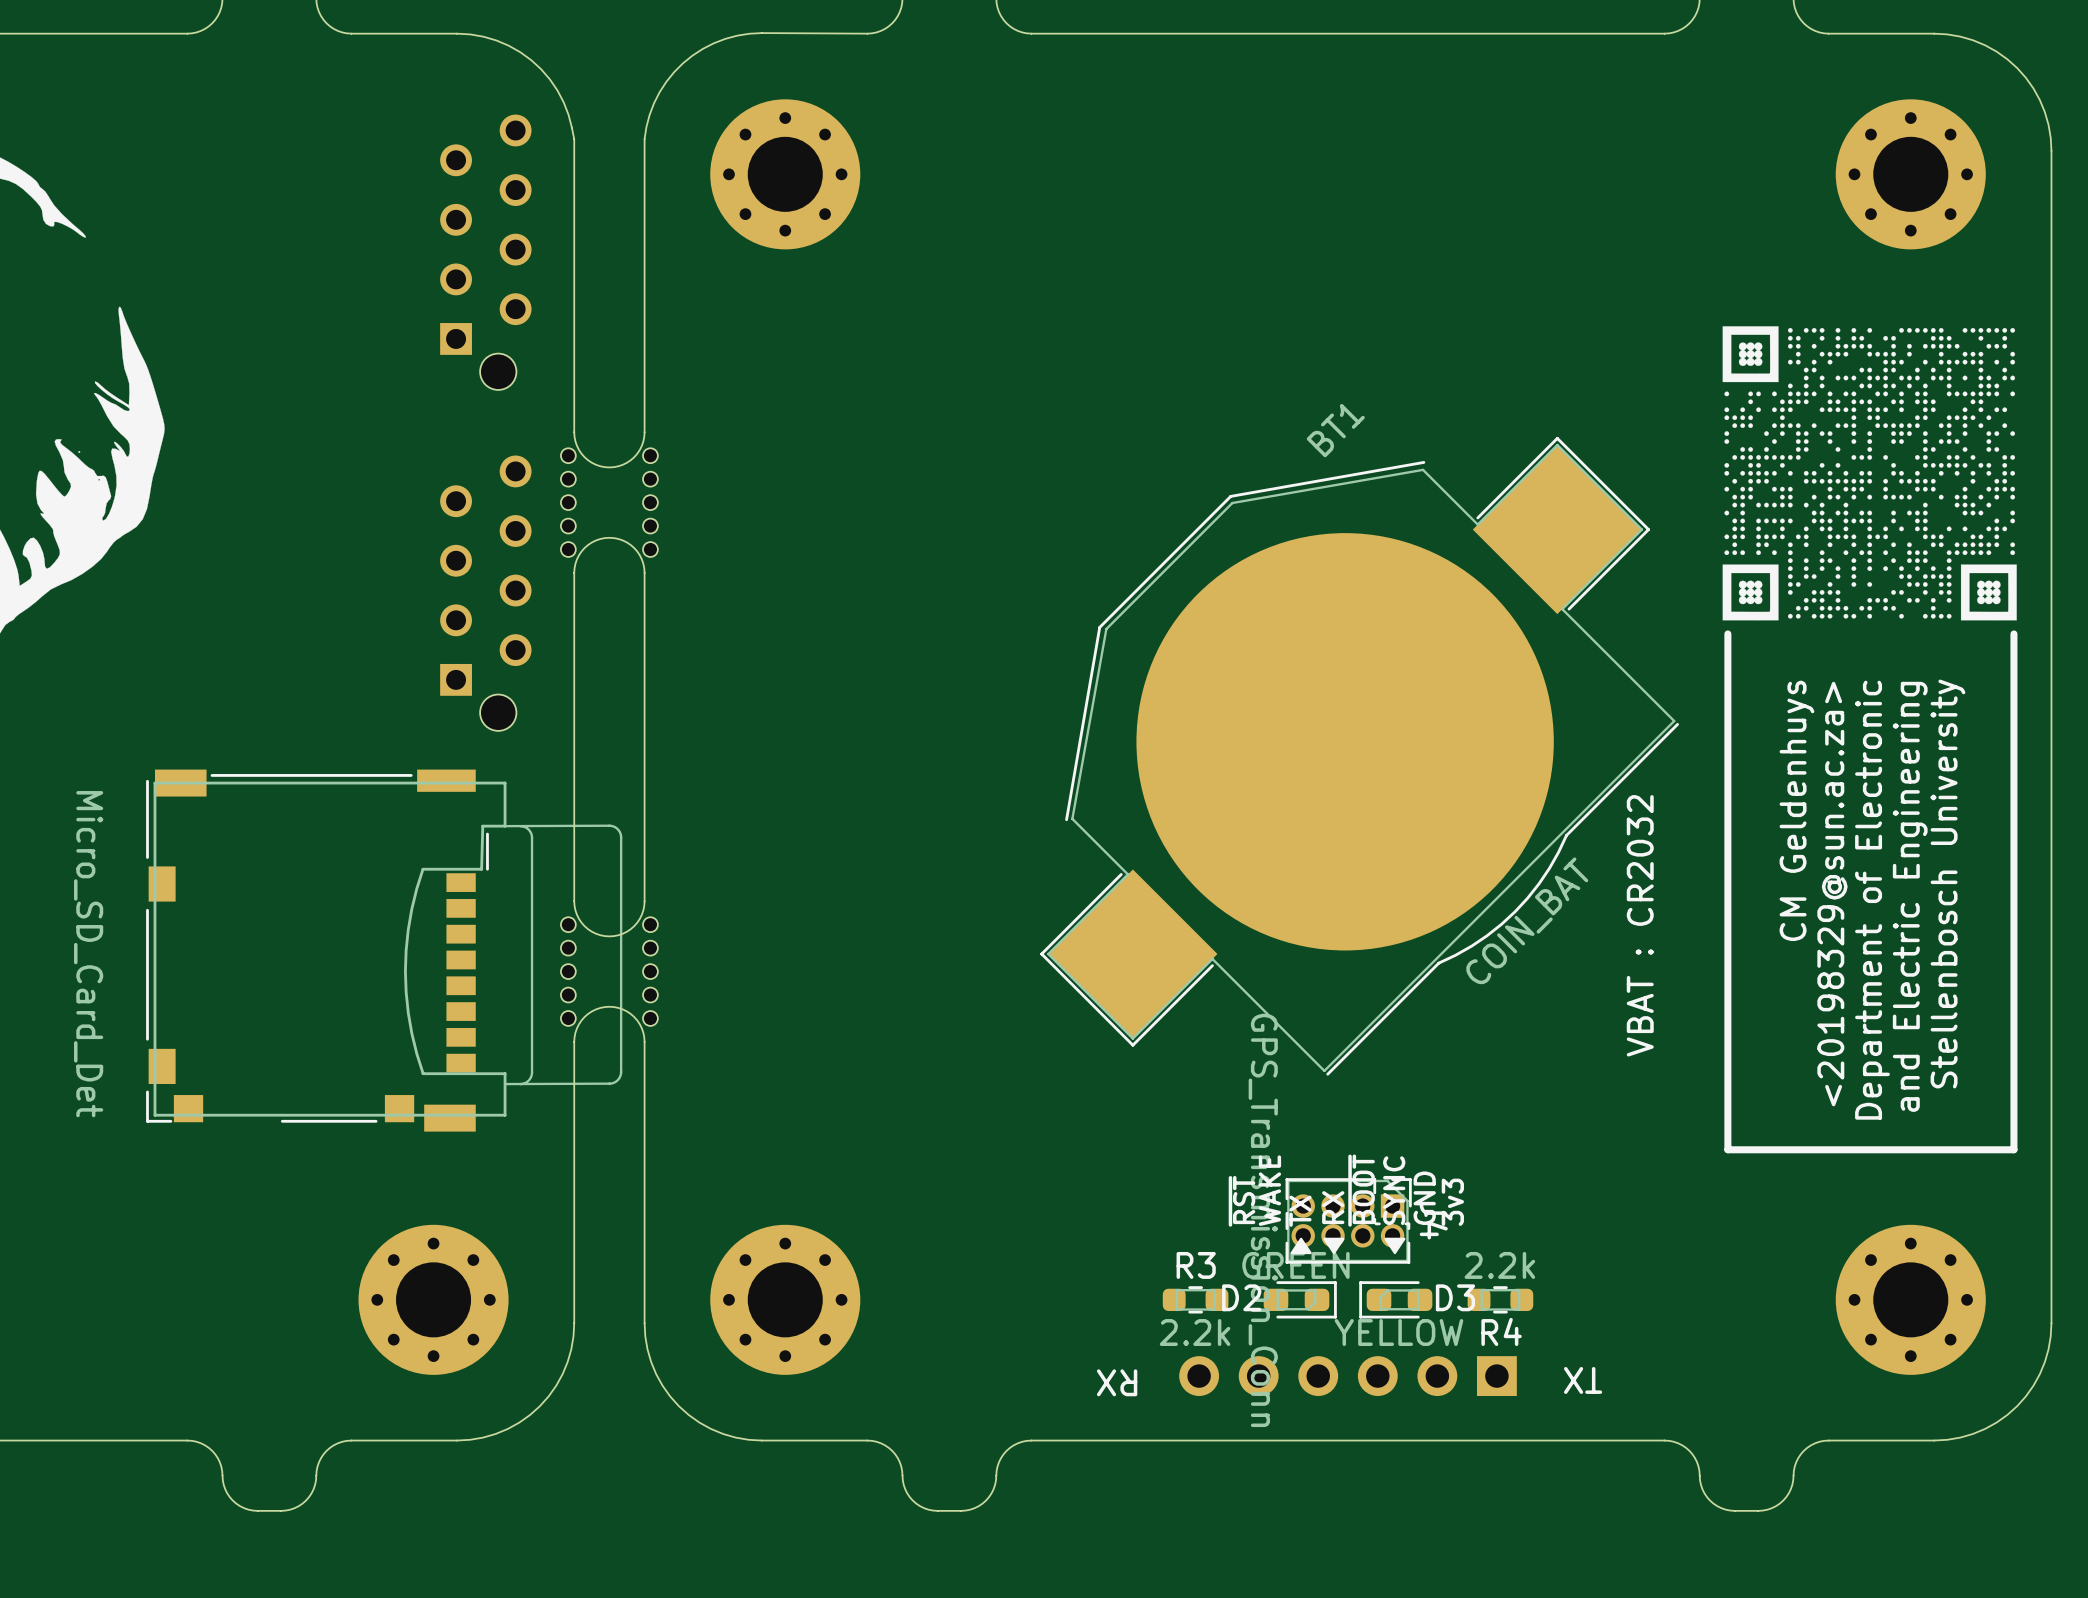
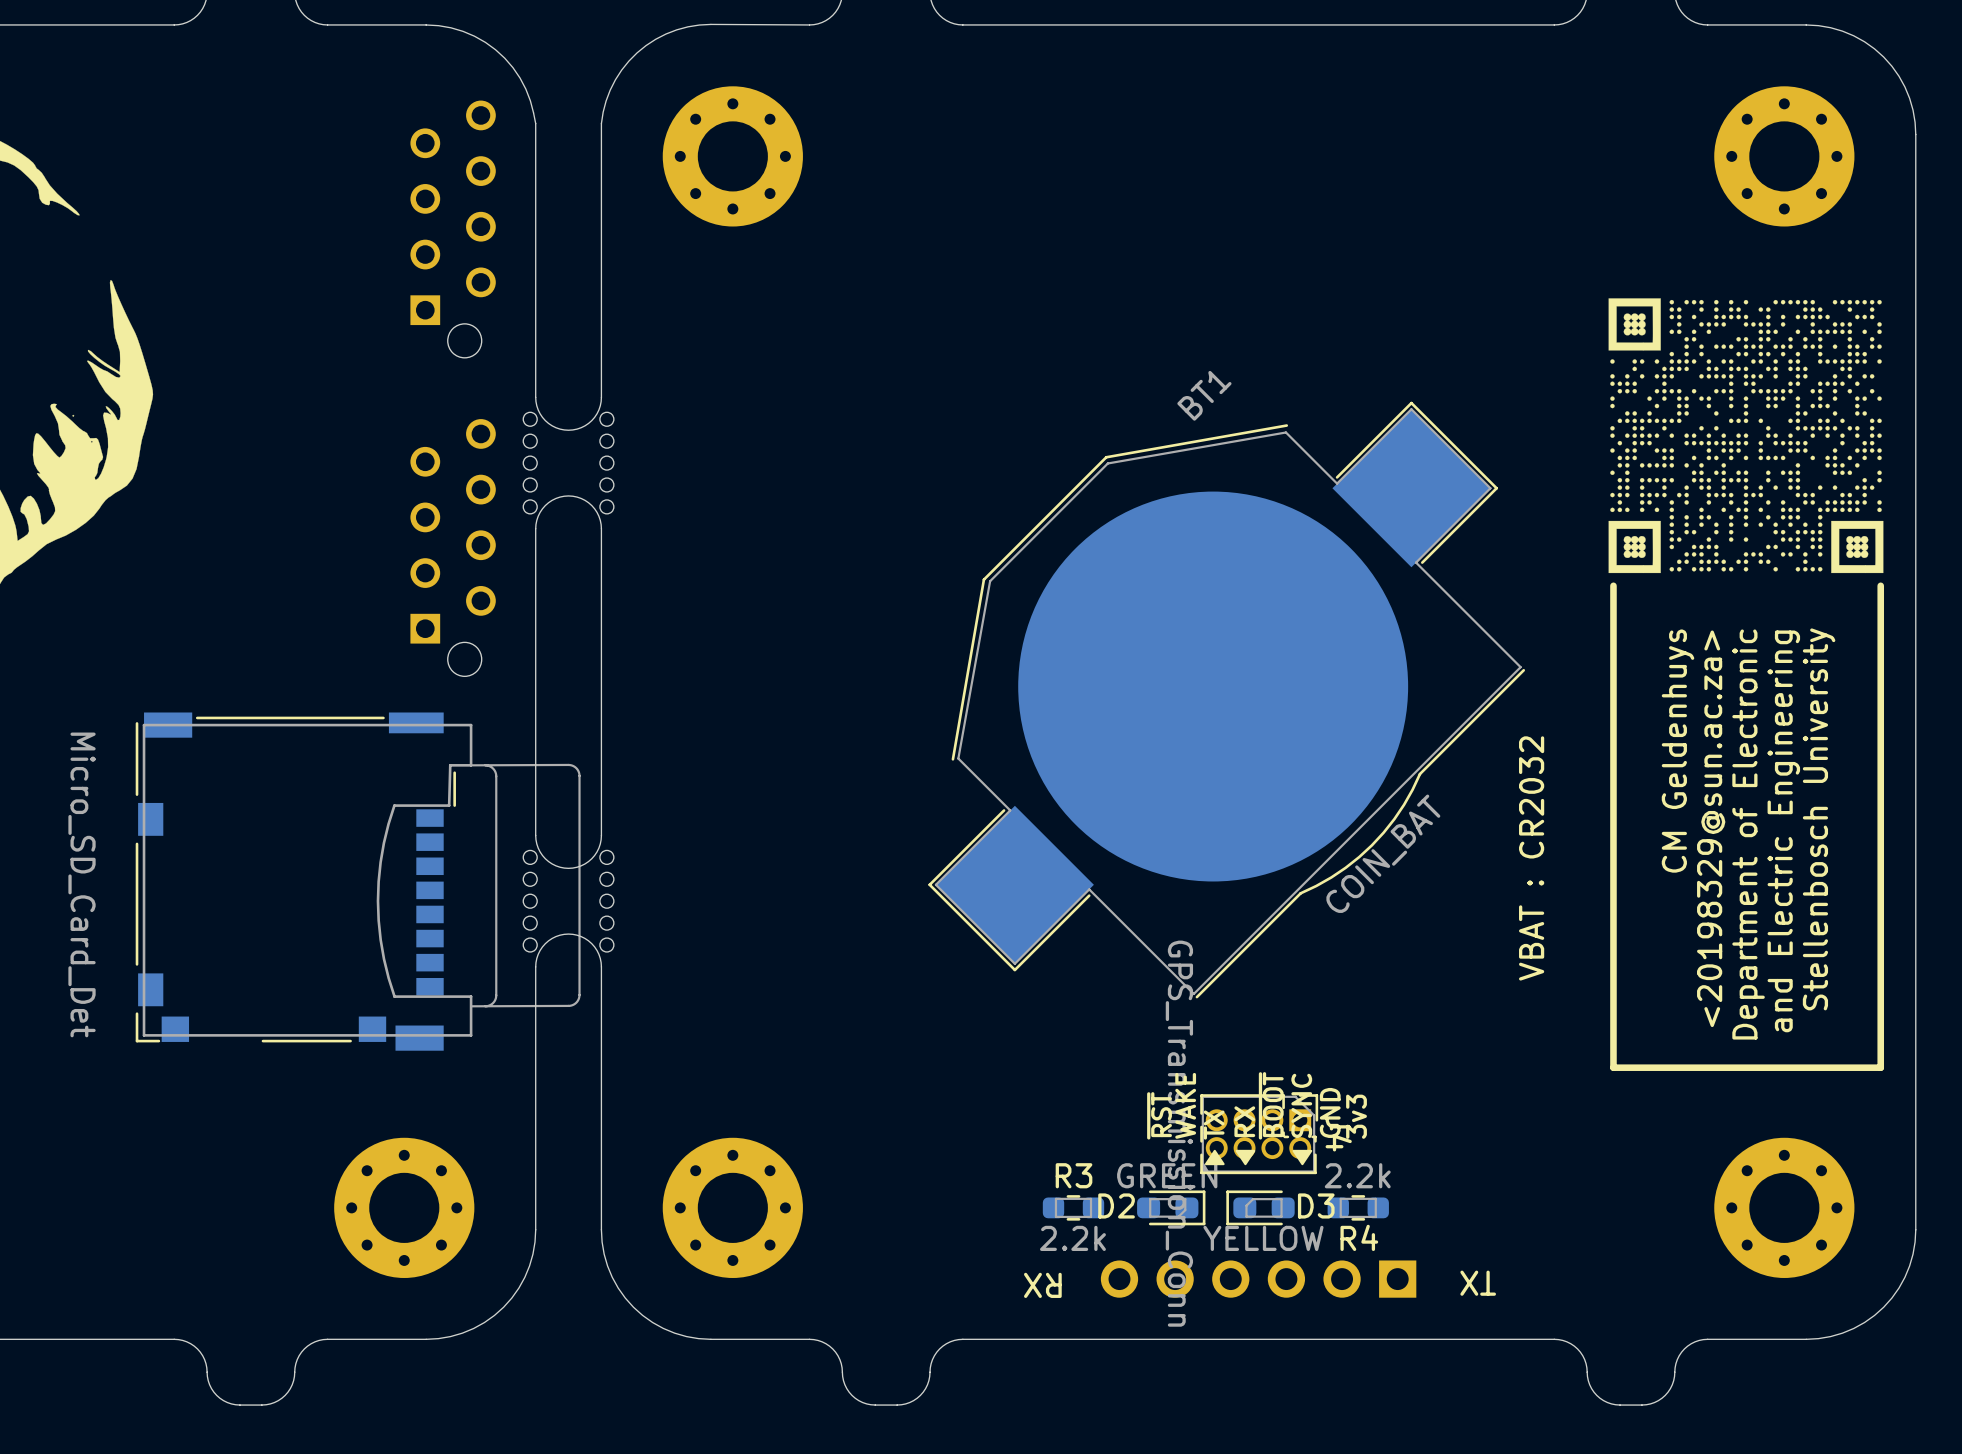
BT1 position: (1359, 756) -> (1226, 700)
R3 position: (1195, 1299) -> (1073, 1207)
D2 position: (1300, 1299) -> (1171, 1207)
D3 position: (1395, 1299) -> (1260, 1207)
R4 position: (1500, 1299) -> (1358, 1207)

